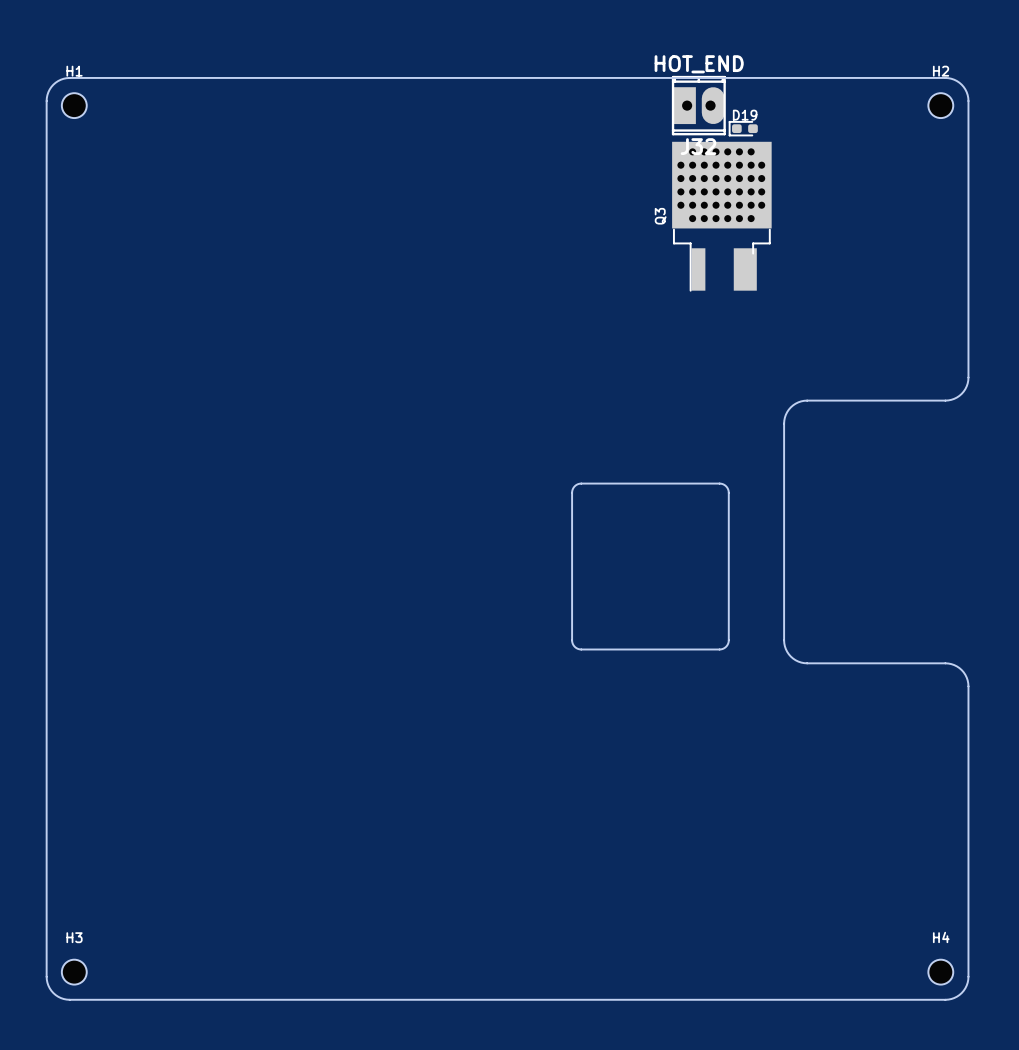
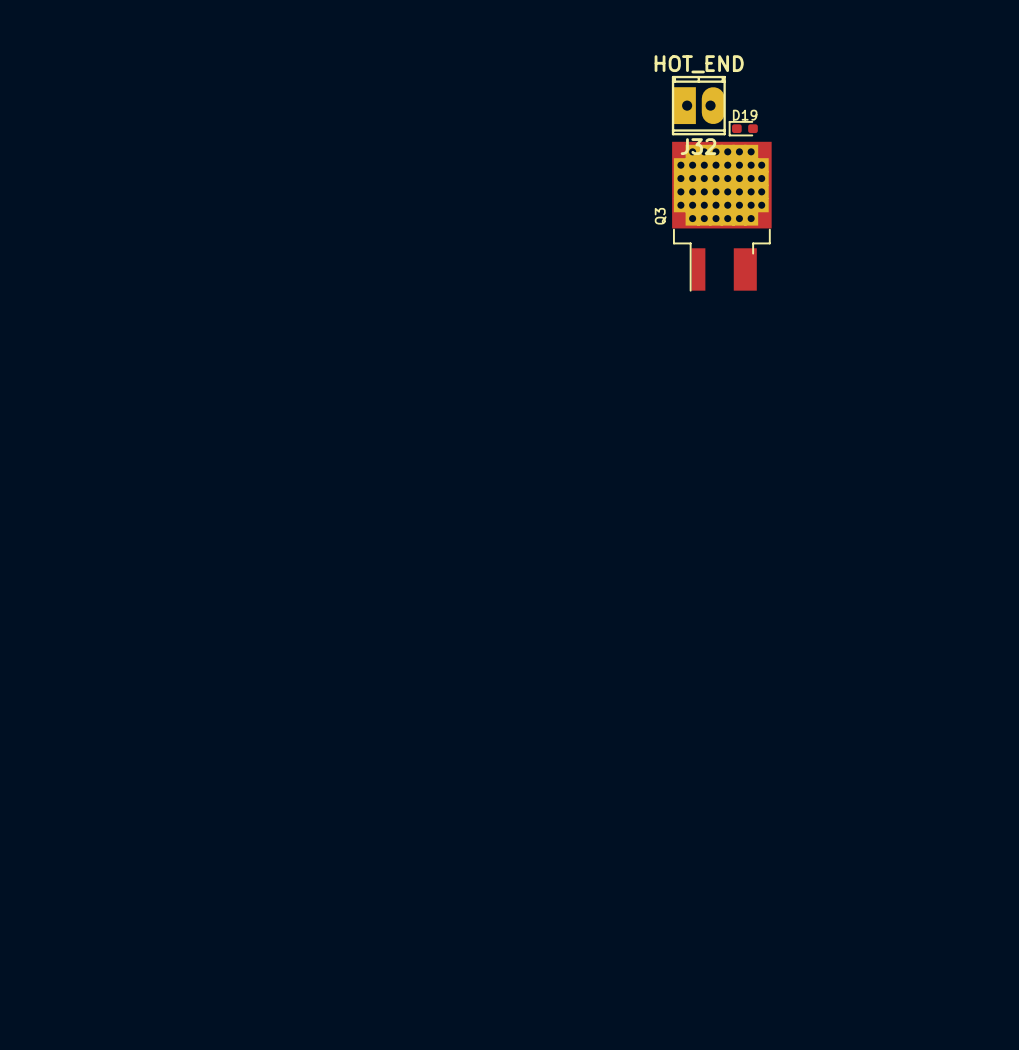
board edge: (69, 77) (945, 77) (954, 79) (961, 84) (966, 92) (968, 101) (968, 377) (965, 389) (956, 397) (948, 400) (804, 400) (790, 407) (785, 414) (784, 423) (784, 640) (788, 654) (795, 660) (807, 663) (948, 663) (961, 670) (967, 680) (968, 976) (966, 985) (961, 993) (954, 998) (945, 999) (69, 999) (60, 998) (53, 993) (48, 985) (46, 976) (46, 101) (48, 92) (53, 84) (60, 79) (69, 77) -> none
H1: (74, 105) -> none
H2: (940, 105) -> none
board edge: (581, 483) (719, 483) (726, 486) (728, 492) (728, 640) (726, 646) (719, 649) (581, 649) (574, 646) (572, 640) (572, 492) (574, 486) (581, 483) -> none
H3: (74, 972) -> none
H4: (940, 972) -> none

